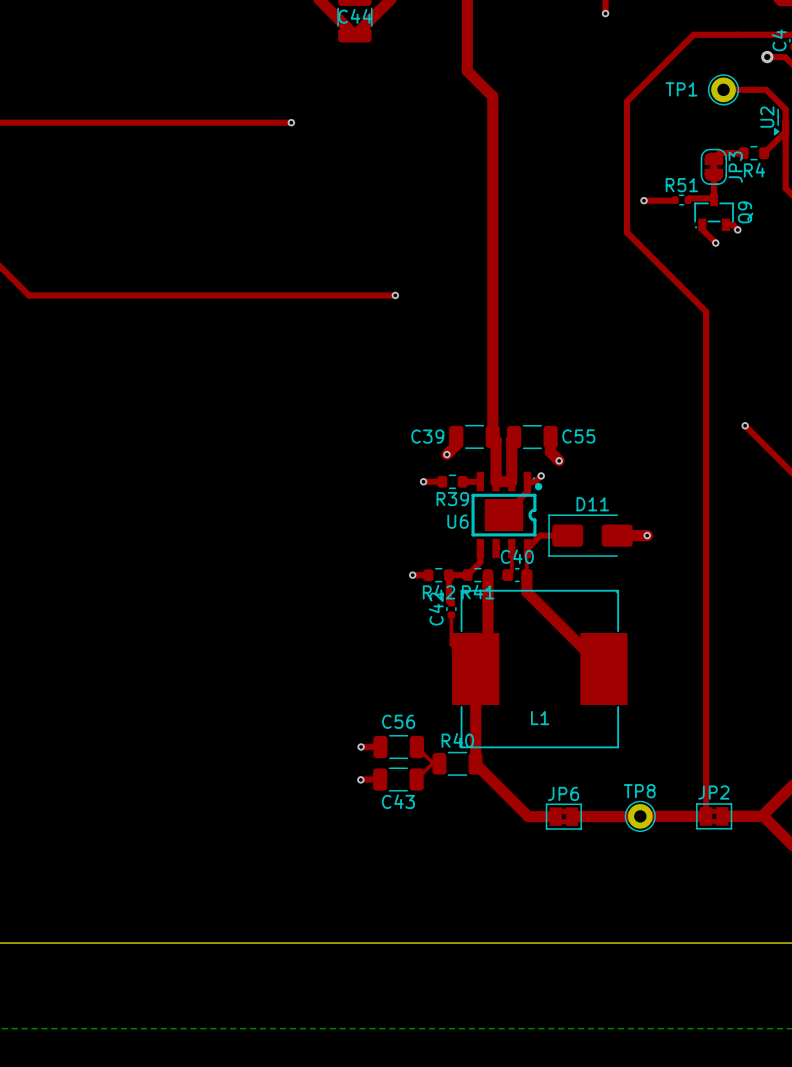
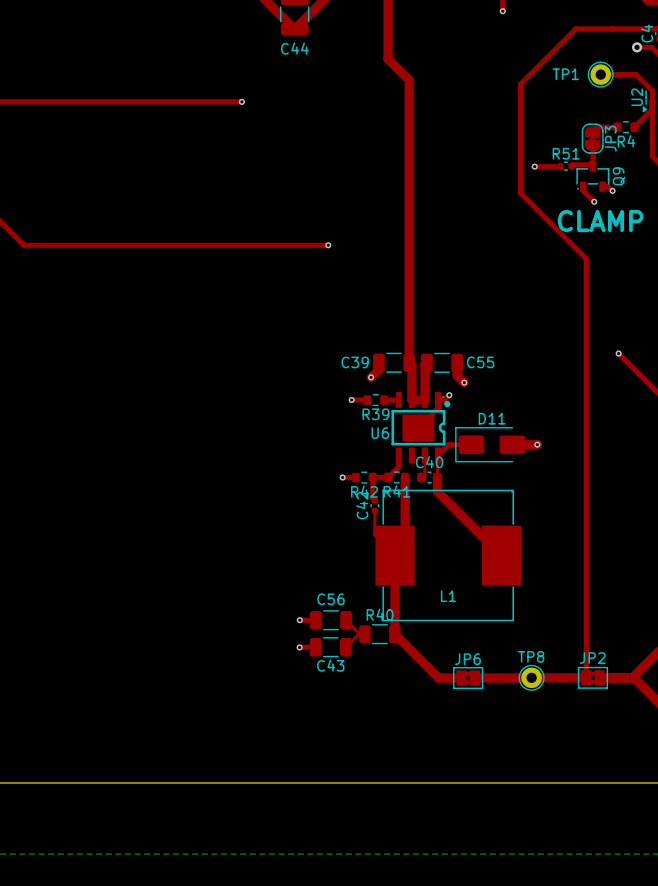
C44 name position: C44 (355, 16) -> C44 (294, 48)
text: none -> CLAMP (600, 221)

